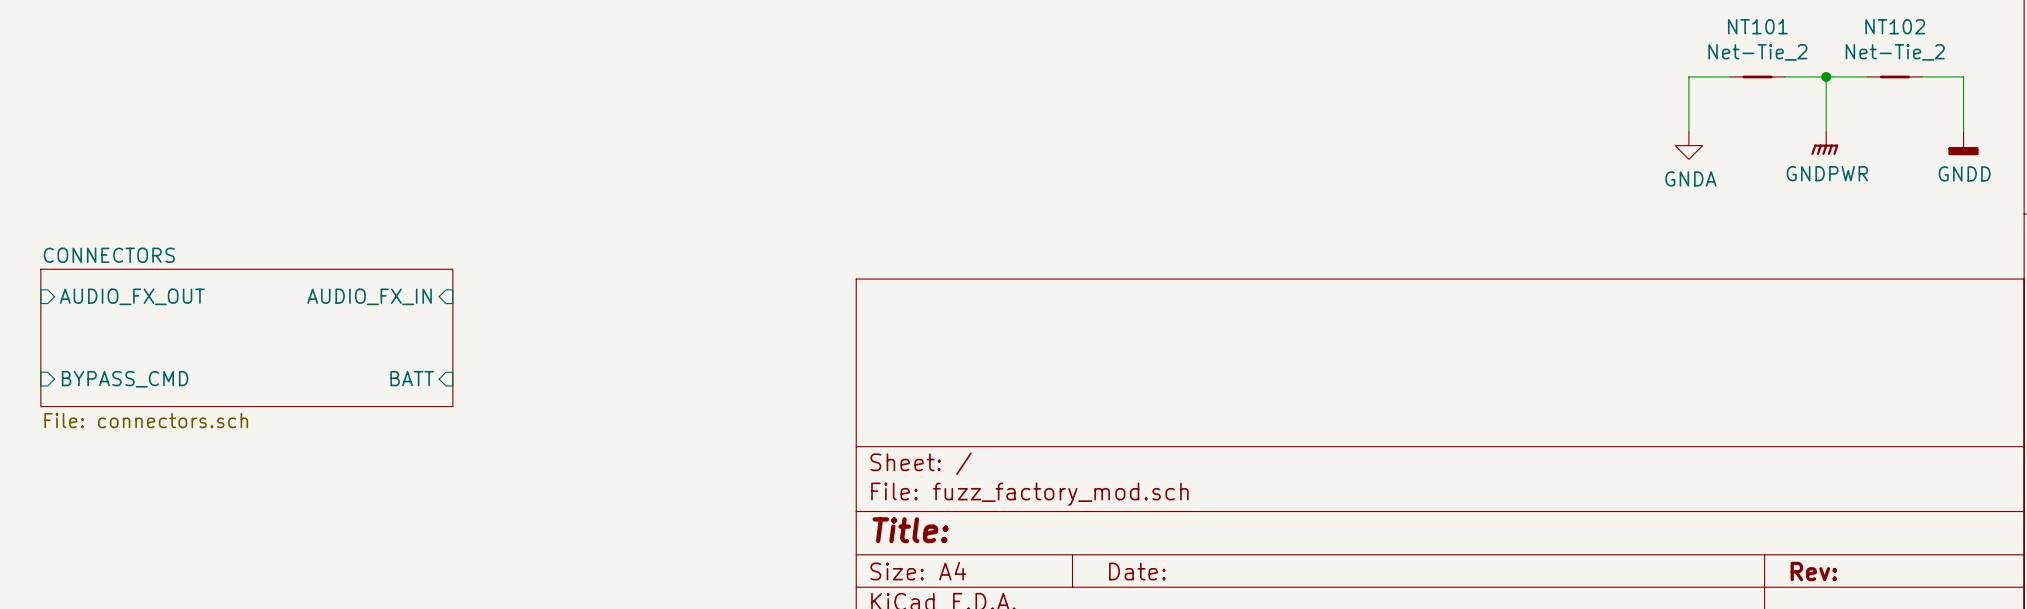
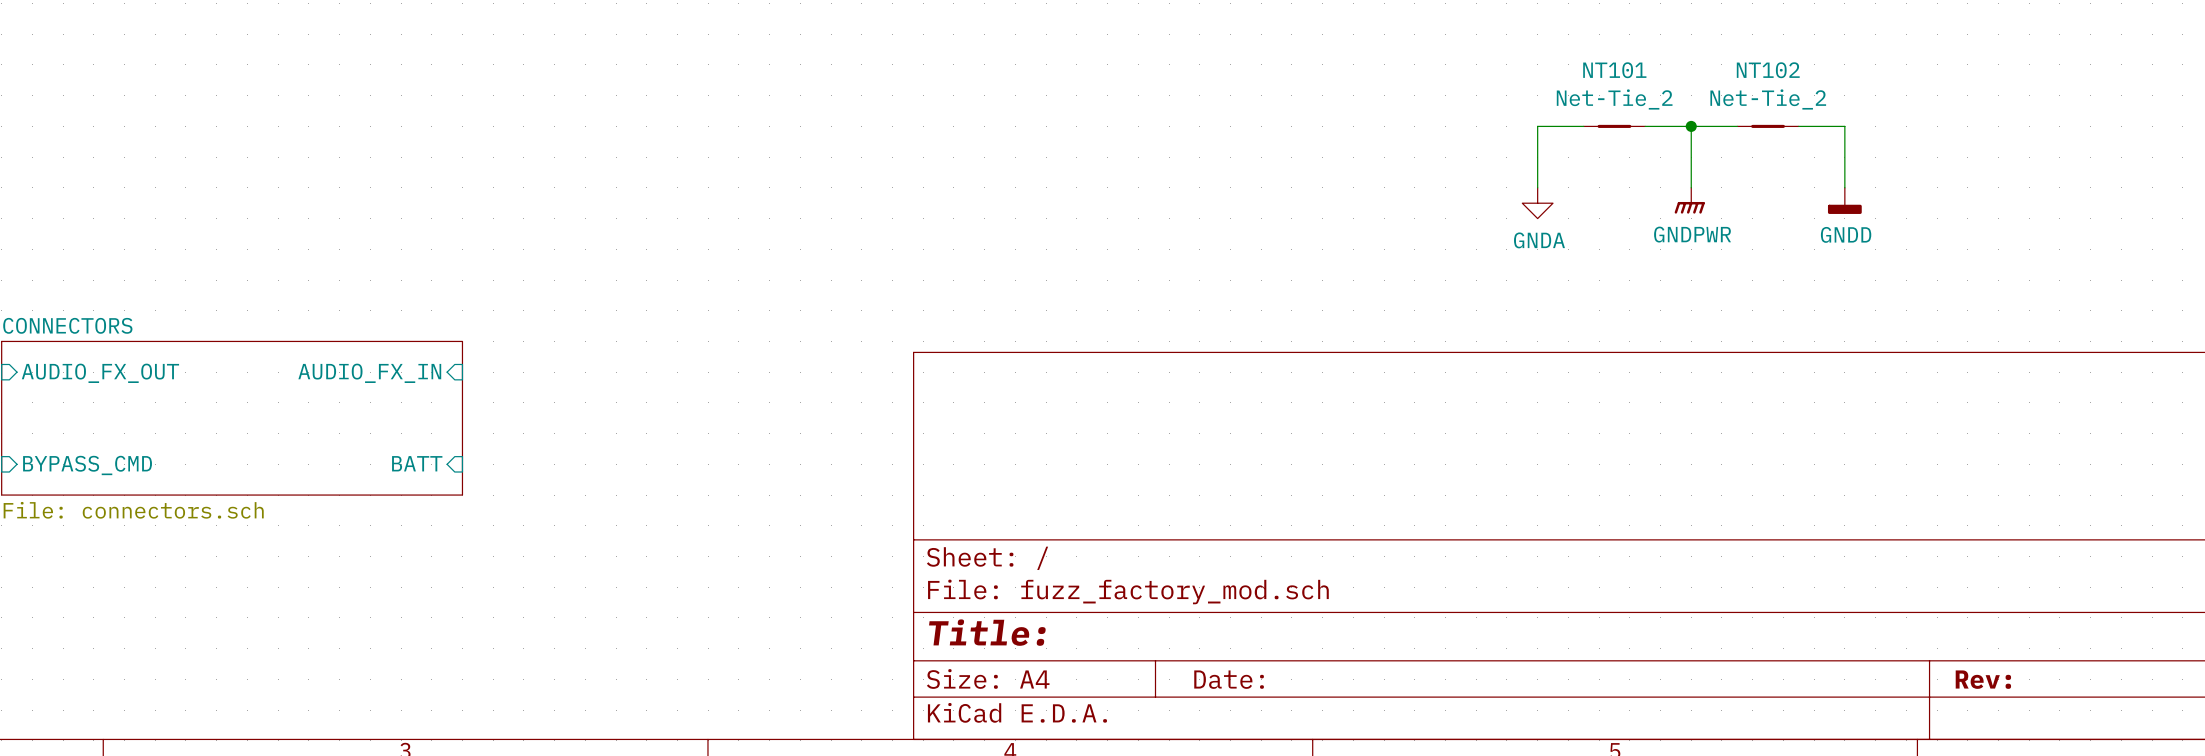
wire: none -> (1583, 126) (1537, 126) (1537, 187)
wire: none -> (1645, 126) (1737, 126)
wire: none -> (1691, 126) (1691, 187)
junction: none -> (1691, 126)
wire: (1688, 76) (1730, 76) -> (1844, 126) (1798, 126)
NT101 position: (1757, 76) -> (1614, 126)
wire: (1785, 76) (1867, 76) -> none
wire: (1826, 76) (1826, 131) -> none
junction: (1826, 76) -> none
NT102 position: (1894, 76) -> (1768, 126)
wire: (1922, 76) (1963, 76) (1963, 131) -> none
power symbol: none -> GNDPWR (1689, 200)
power symbol: GNDPWR (1824, 143) -> none
power symbol: GNDD (1963, 143) -> none
power symbol: none -> GNDA (1537, 203)
power symbol: GNDA (1688, 145) -> GNDD (1844, 200)

